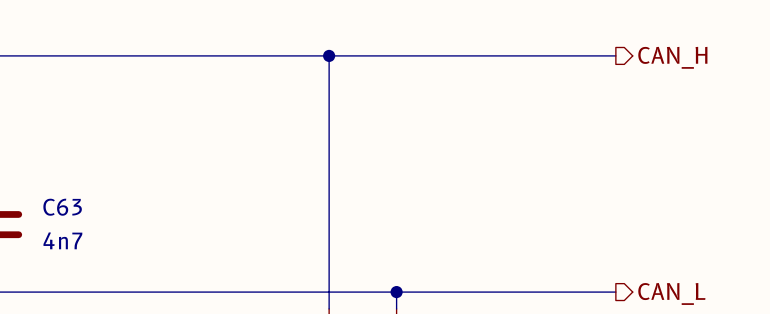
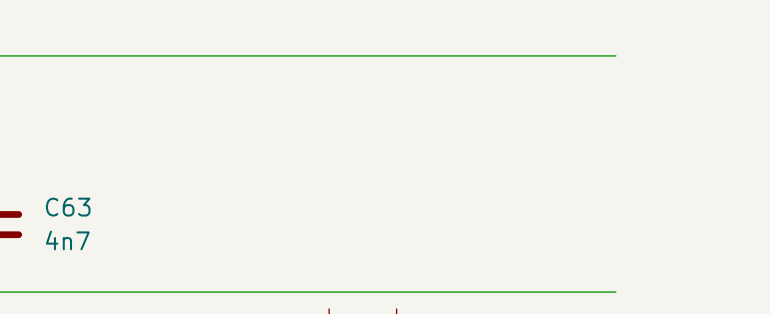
wire: (329, 55) (329, 308) -> none
junction: (329, 55) -> none
hierarchical label: CAN_H (672, 57) -> none
wire: (396, 292) (396, 308) -> none
junction: (396, 292) -> none
hierarchical label: CAN_L (671, 293) -> none

